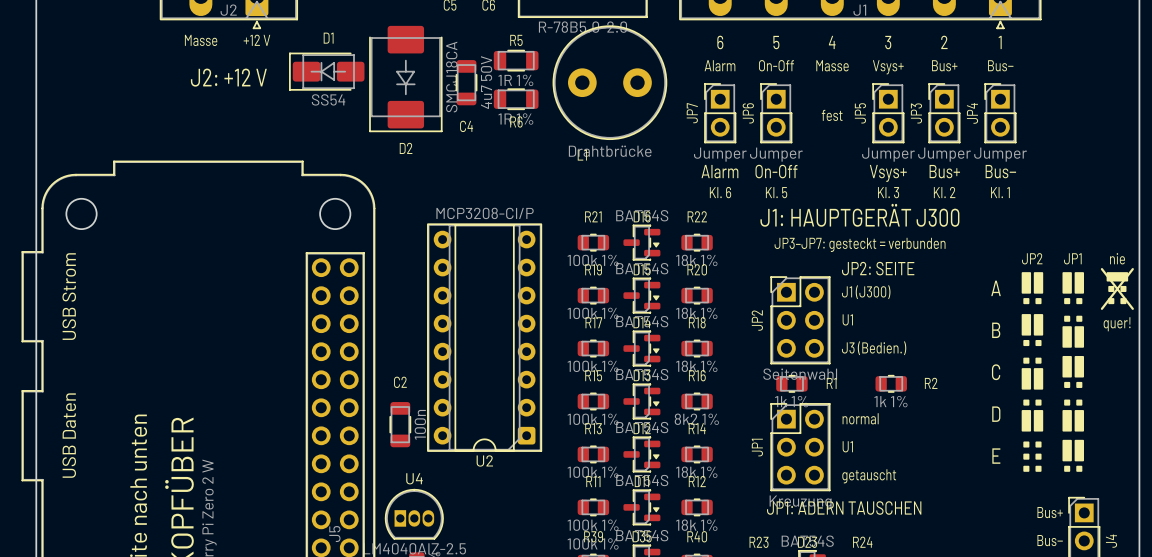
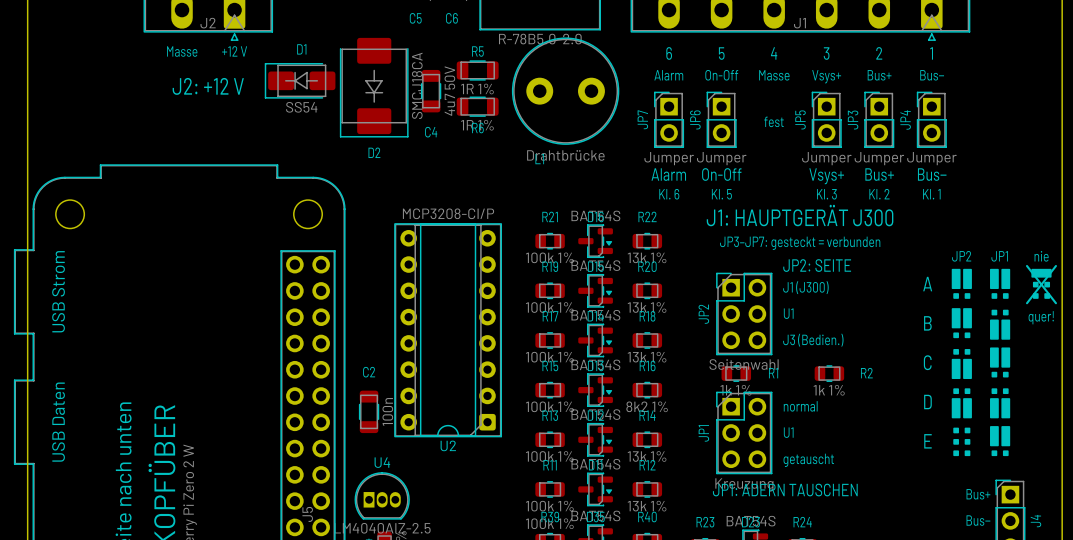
R22 value: 18k 1% (696, 260) -> 13k 1% (647, 257)
R20 value: 18k 1% (696, 313) -> 13k 1% (647, 307)
R18 value: 18k 1% (696, 366) -> 13k 1% (647, 357)
R14 value: 18k 1% (696, 472) -> 13k 1% (647, 456)
R12 value: 18k 1% (696, 525) -> 13k 1% (647, 506)

